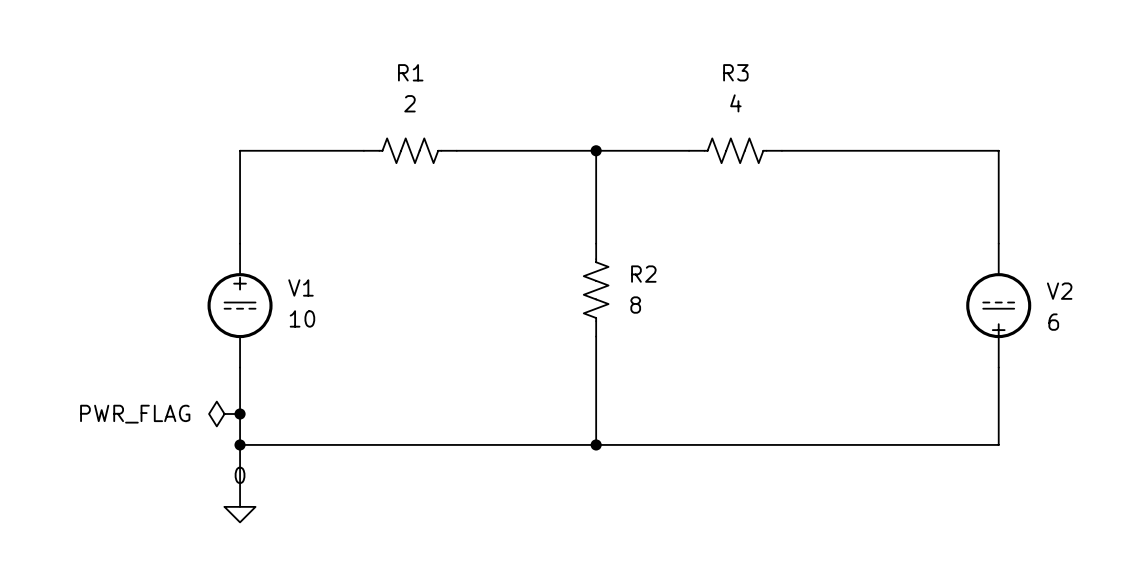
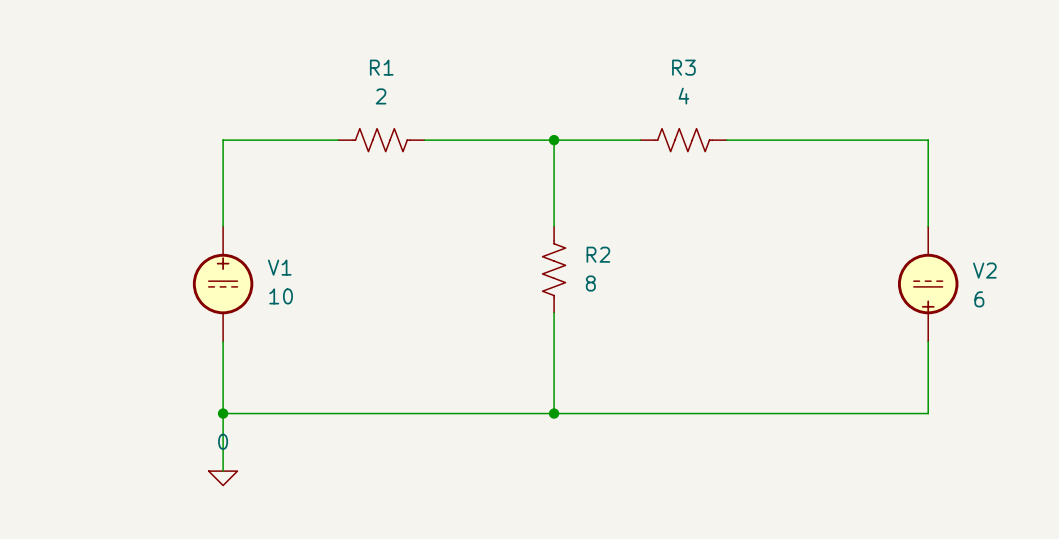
power symbol: PWR_FLAG (224, 413) -> none
junction: (240, 413) -> none

